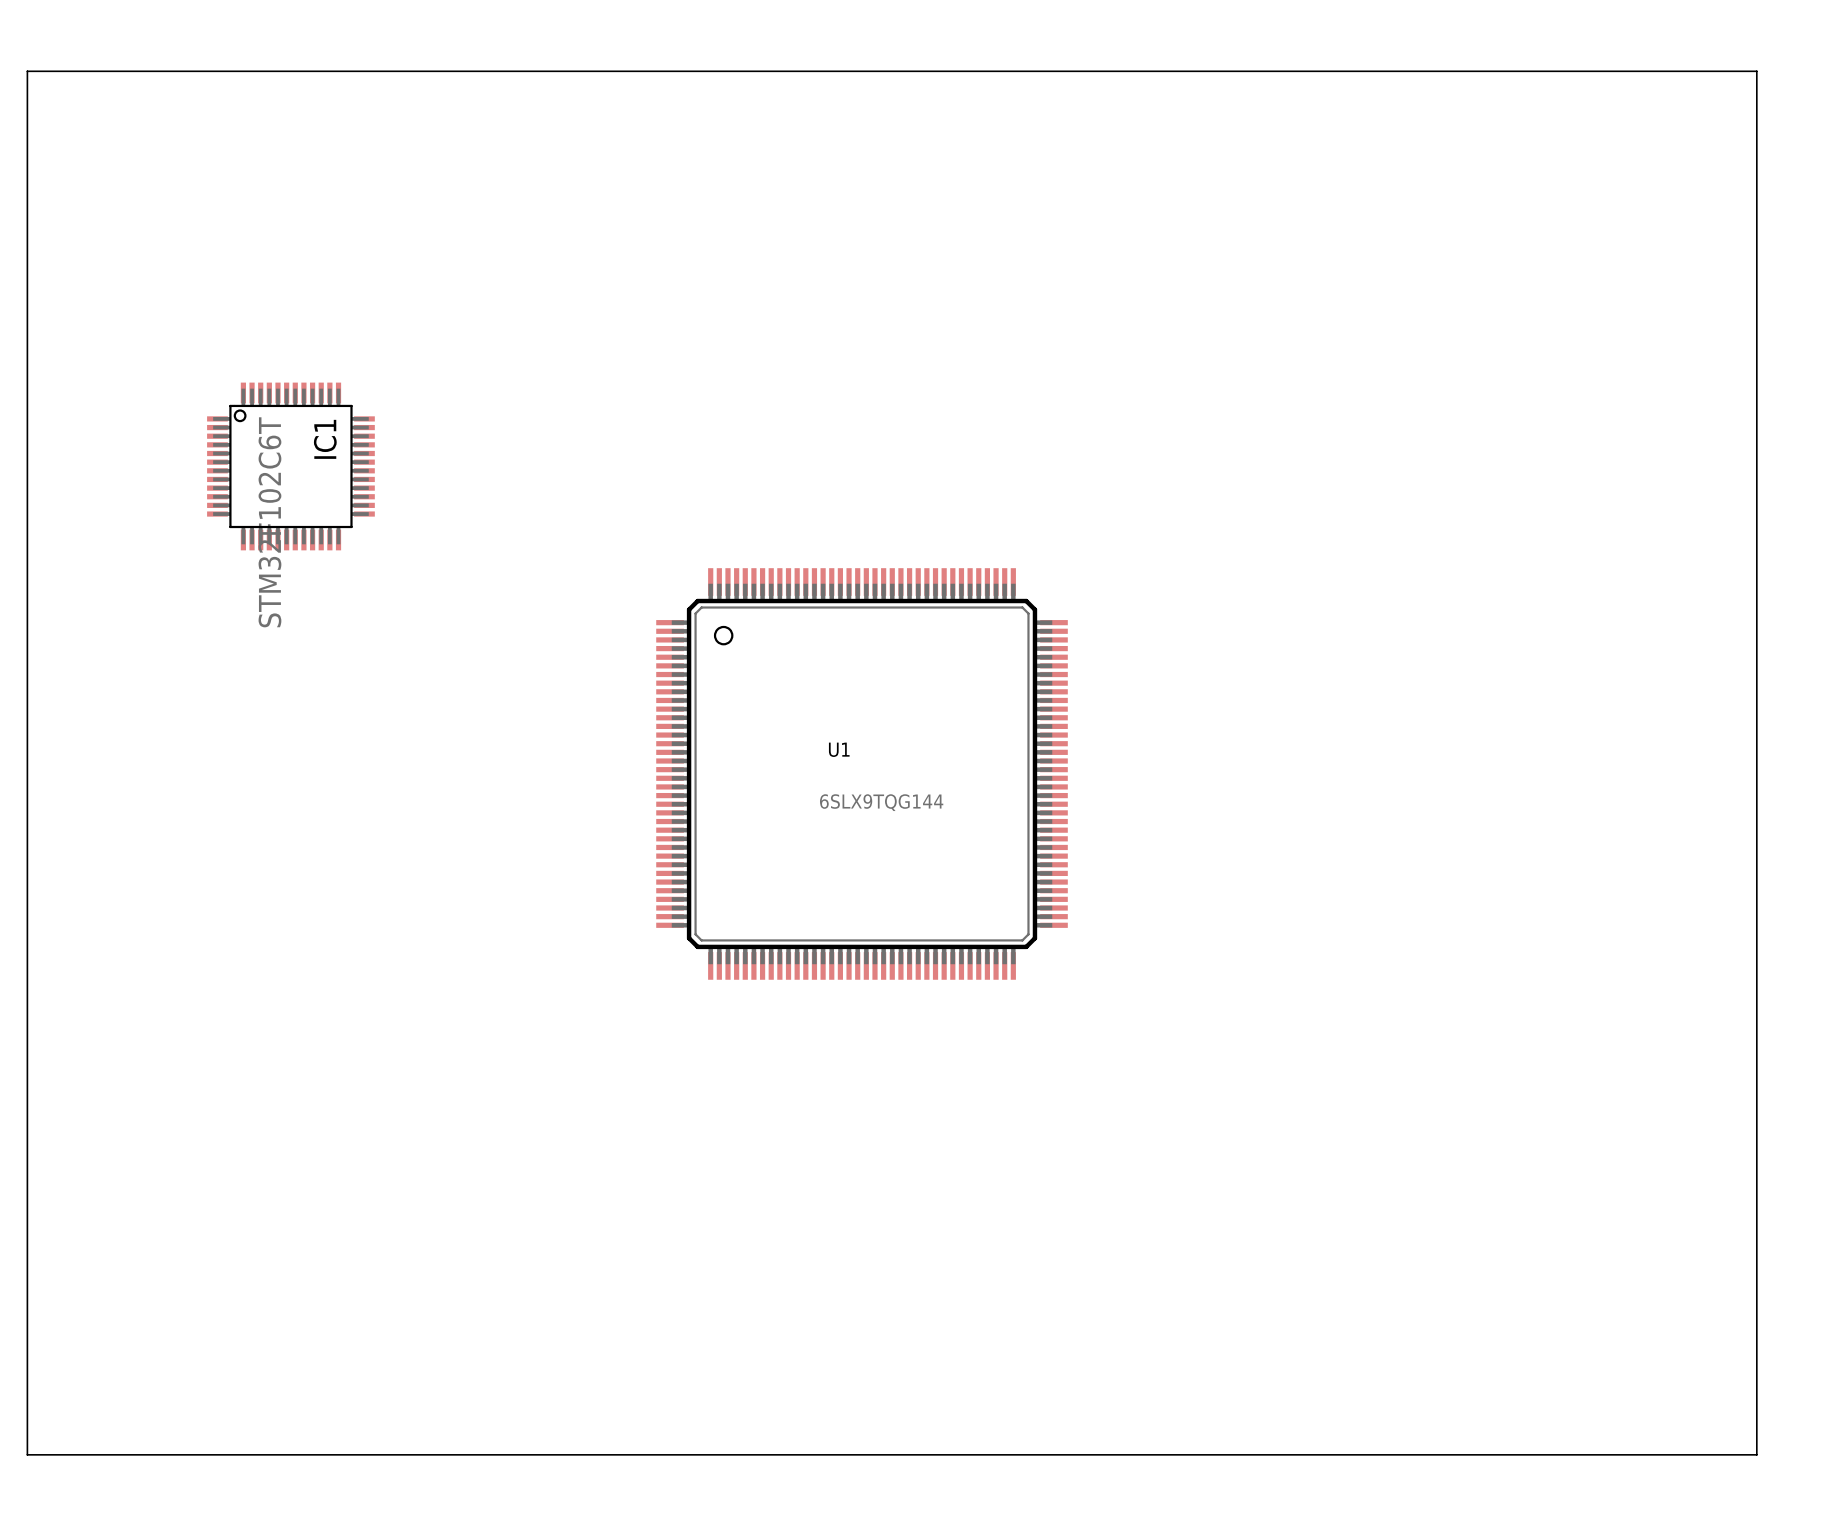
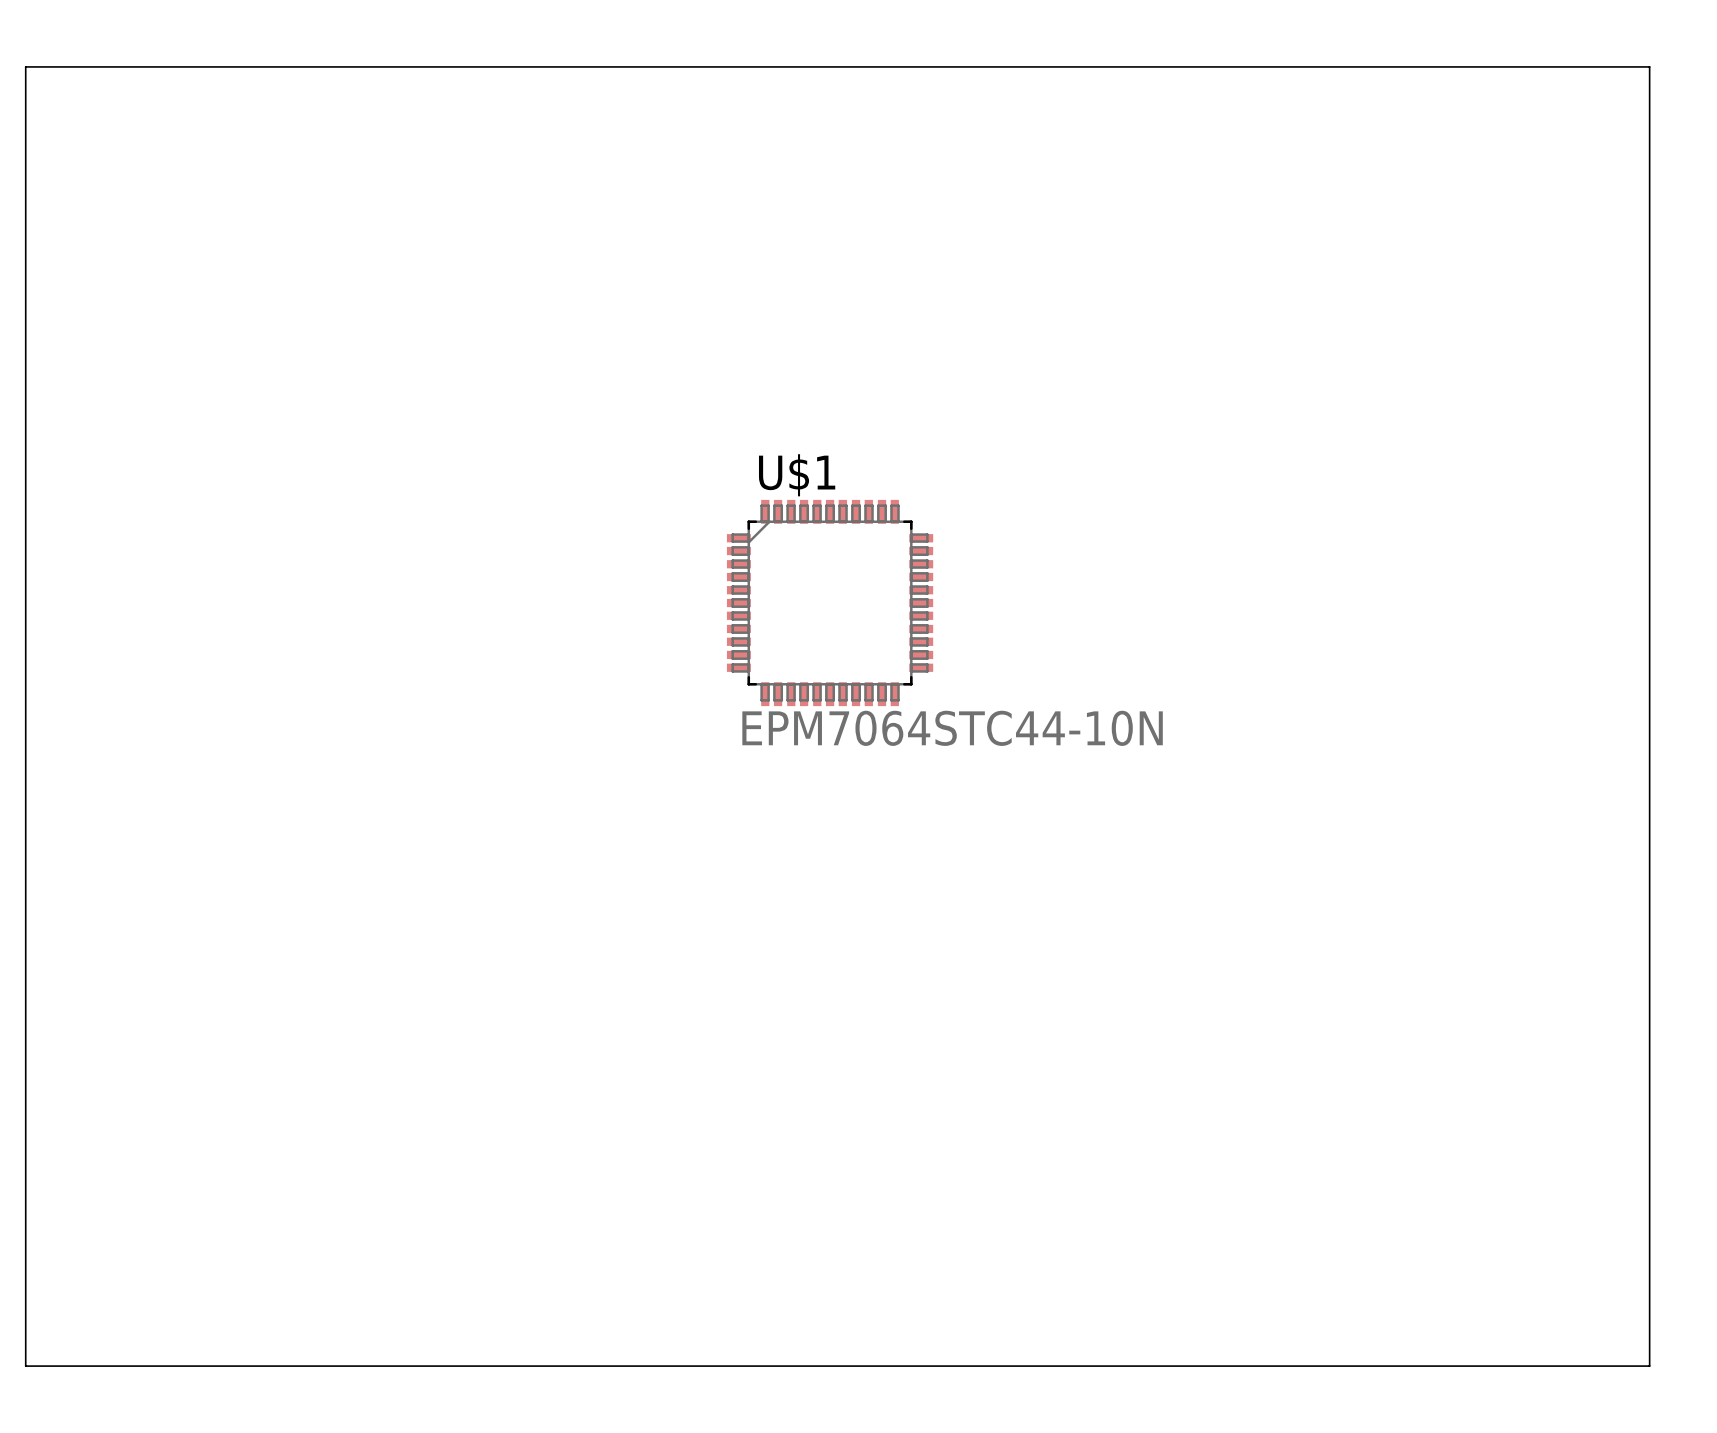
IC1: STM32F102C6T (290, 466) -> none
U$1: none -> EPM7064STC44-10N (830, 603)
U1: 6SLX9TQG144 (862, 773) -> none

